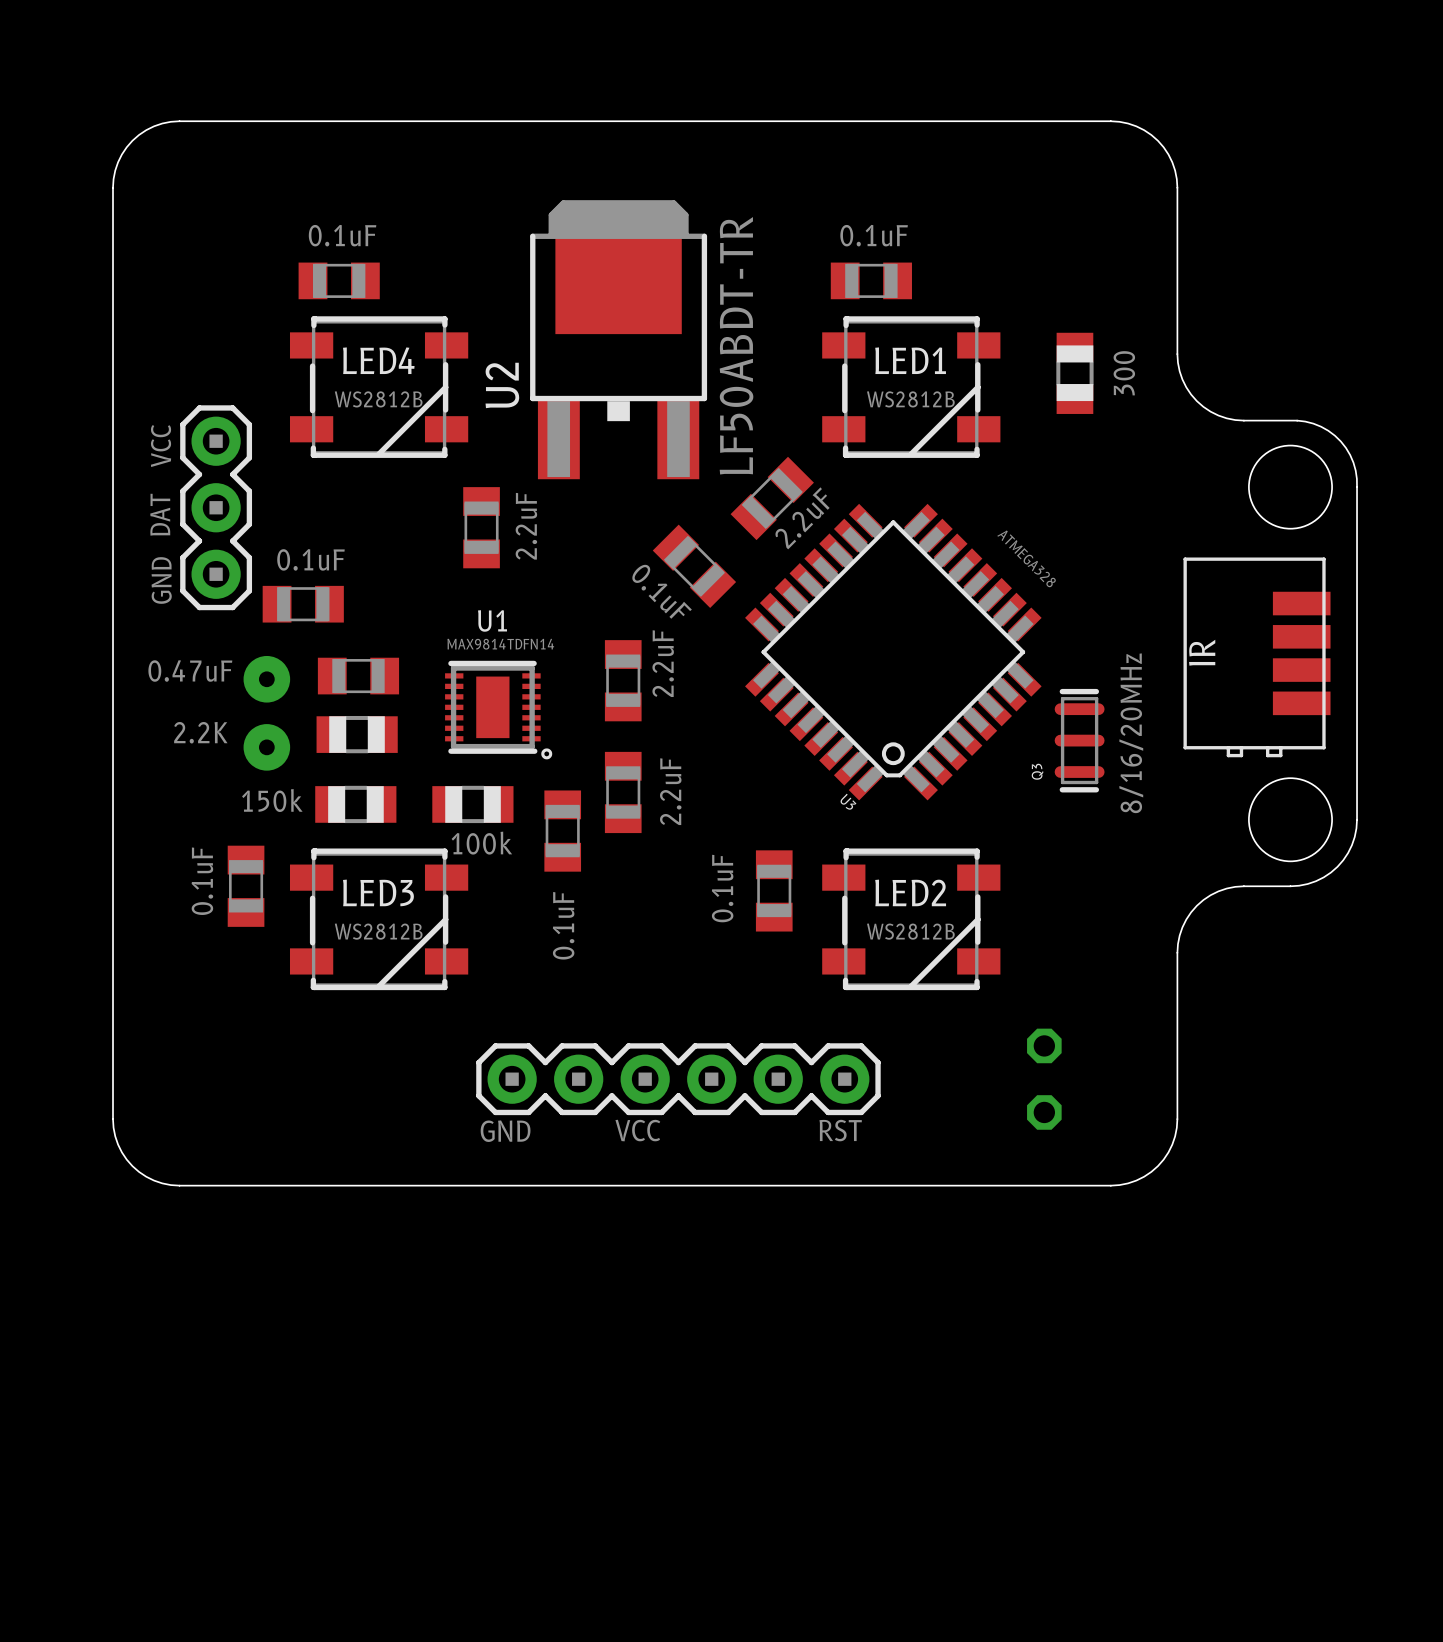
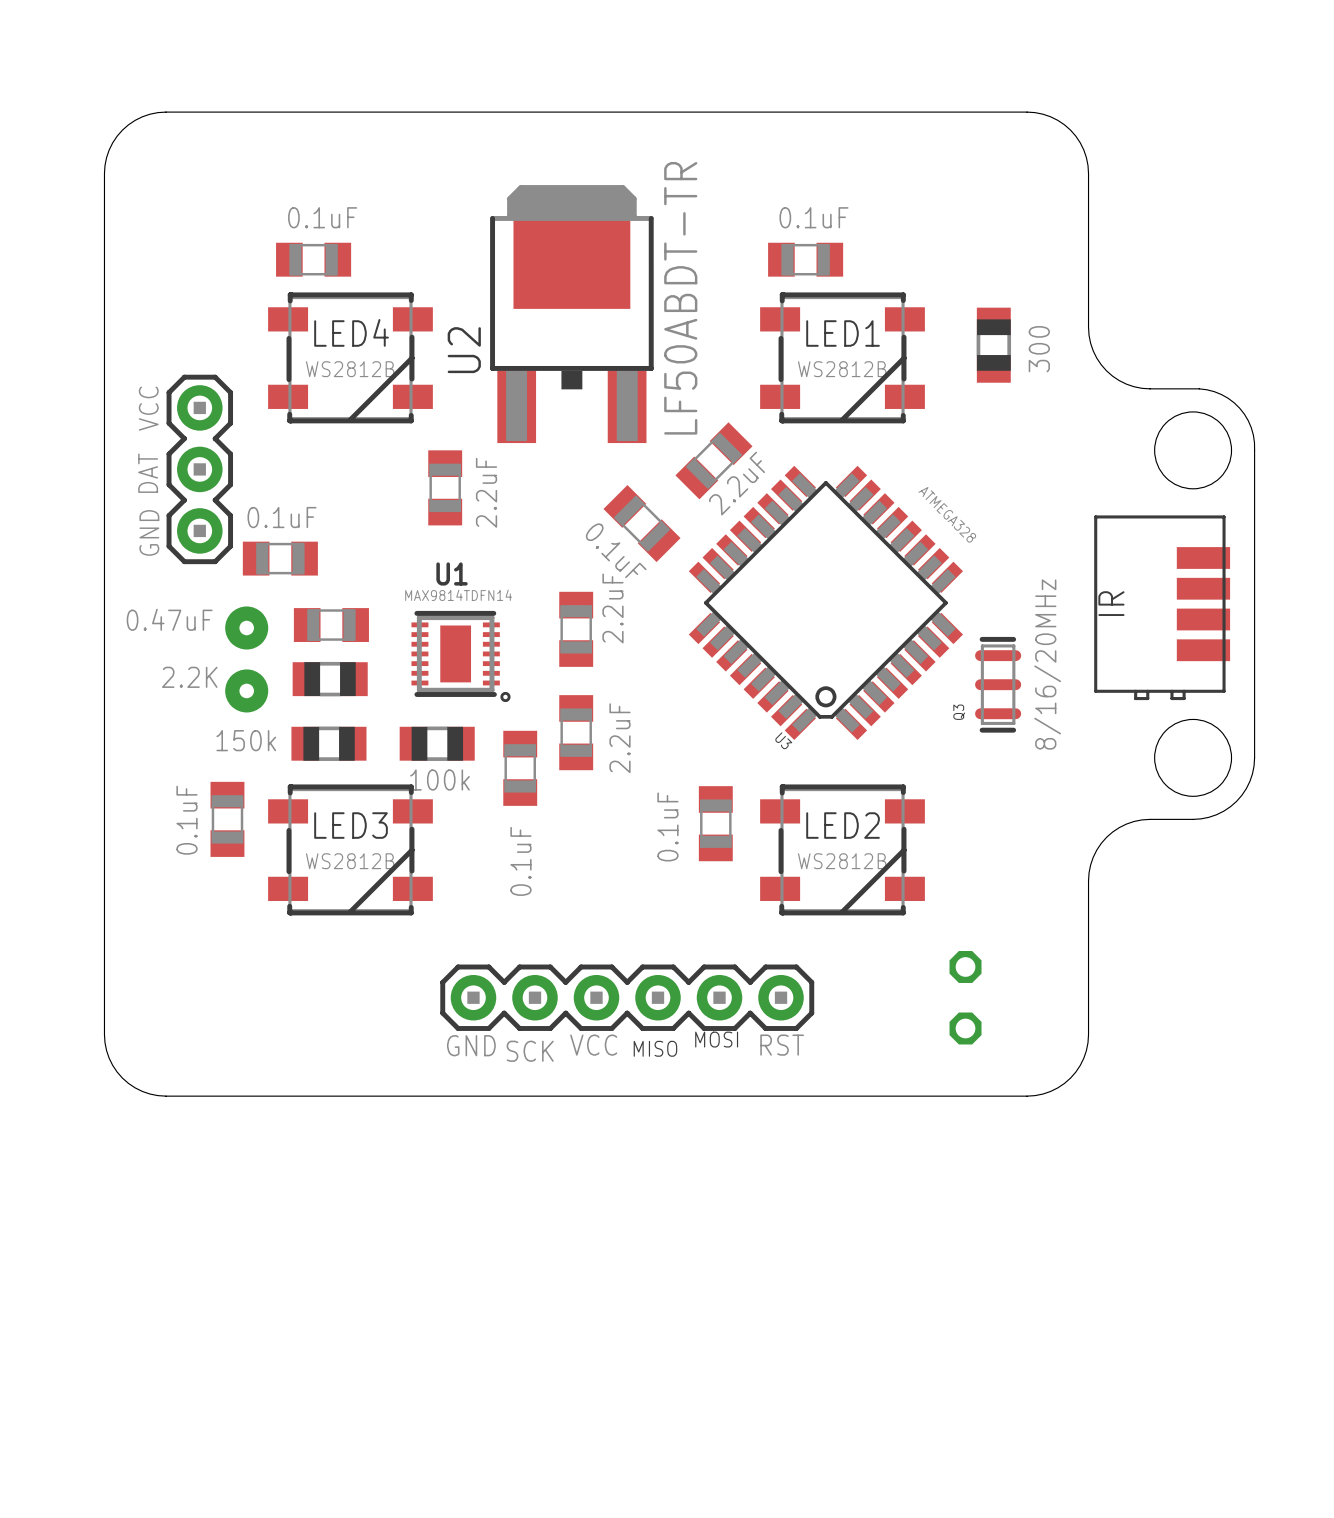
text: none -> MOSI (716, 1039)
text: none -> MISO (655, 1048)
text: none -> SCK (530, 1051)

